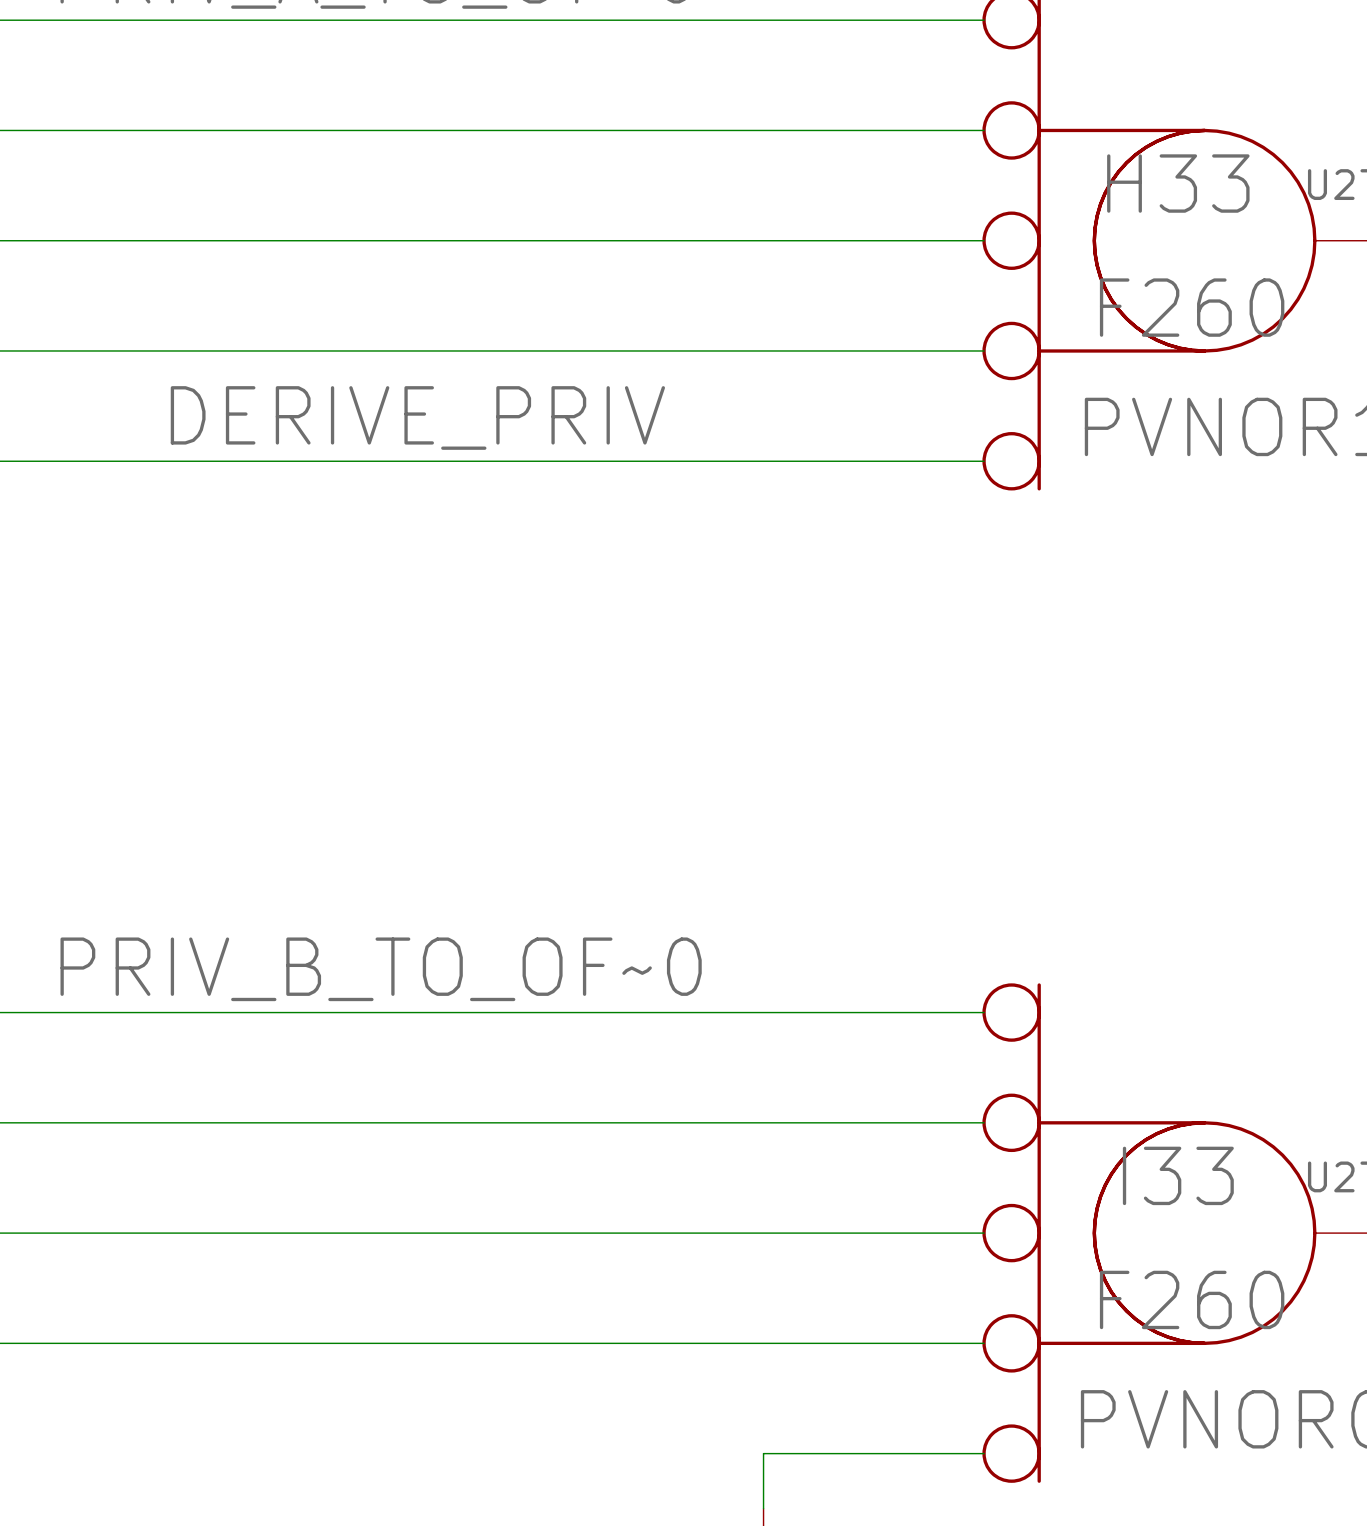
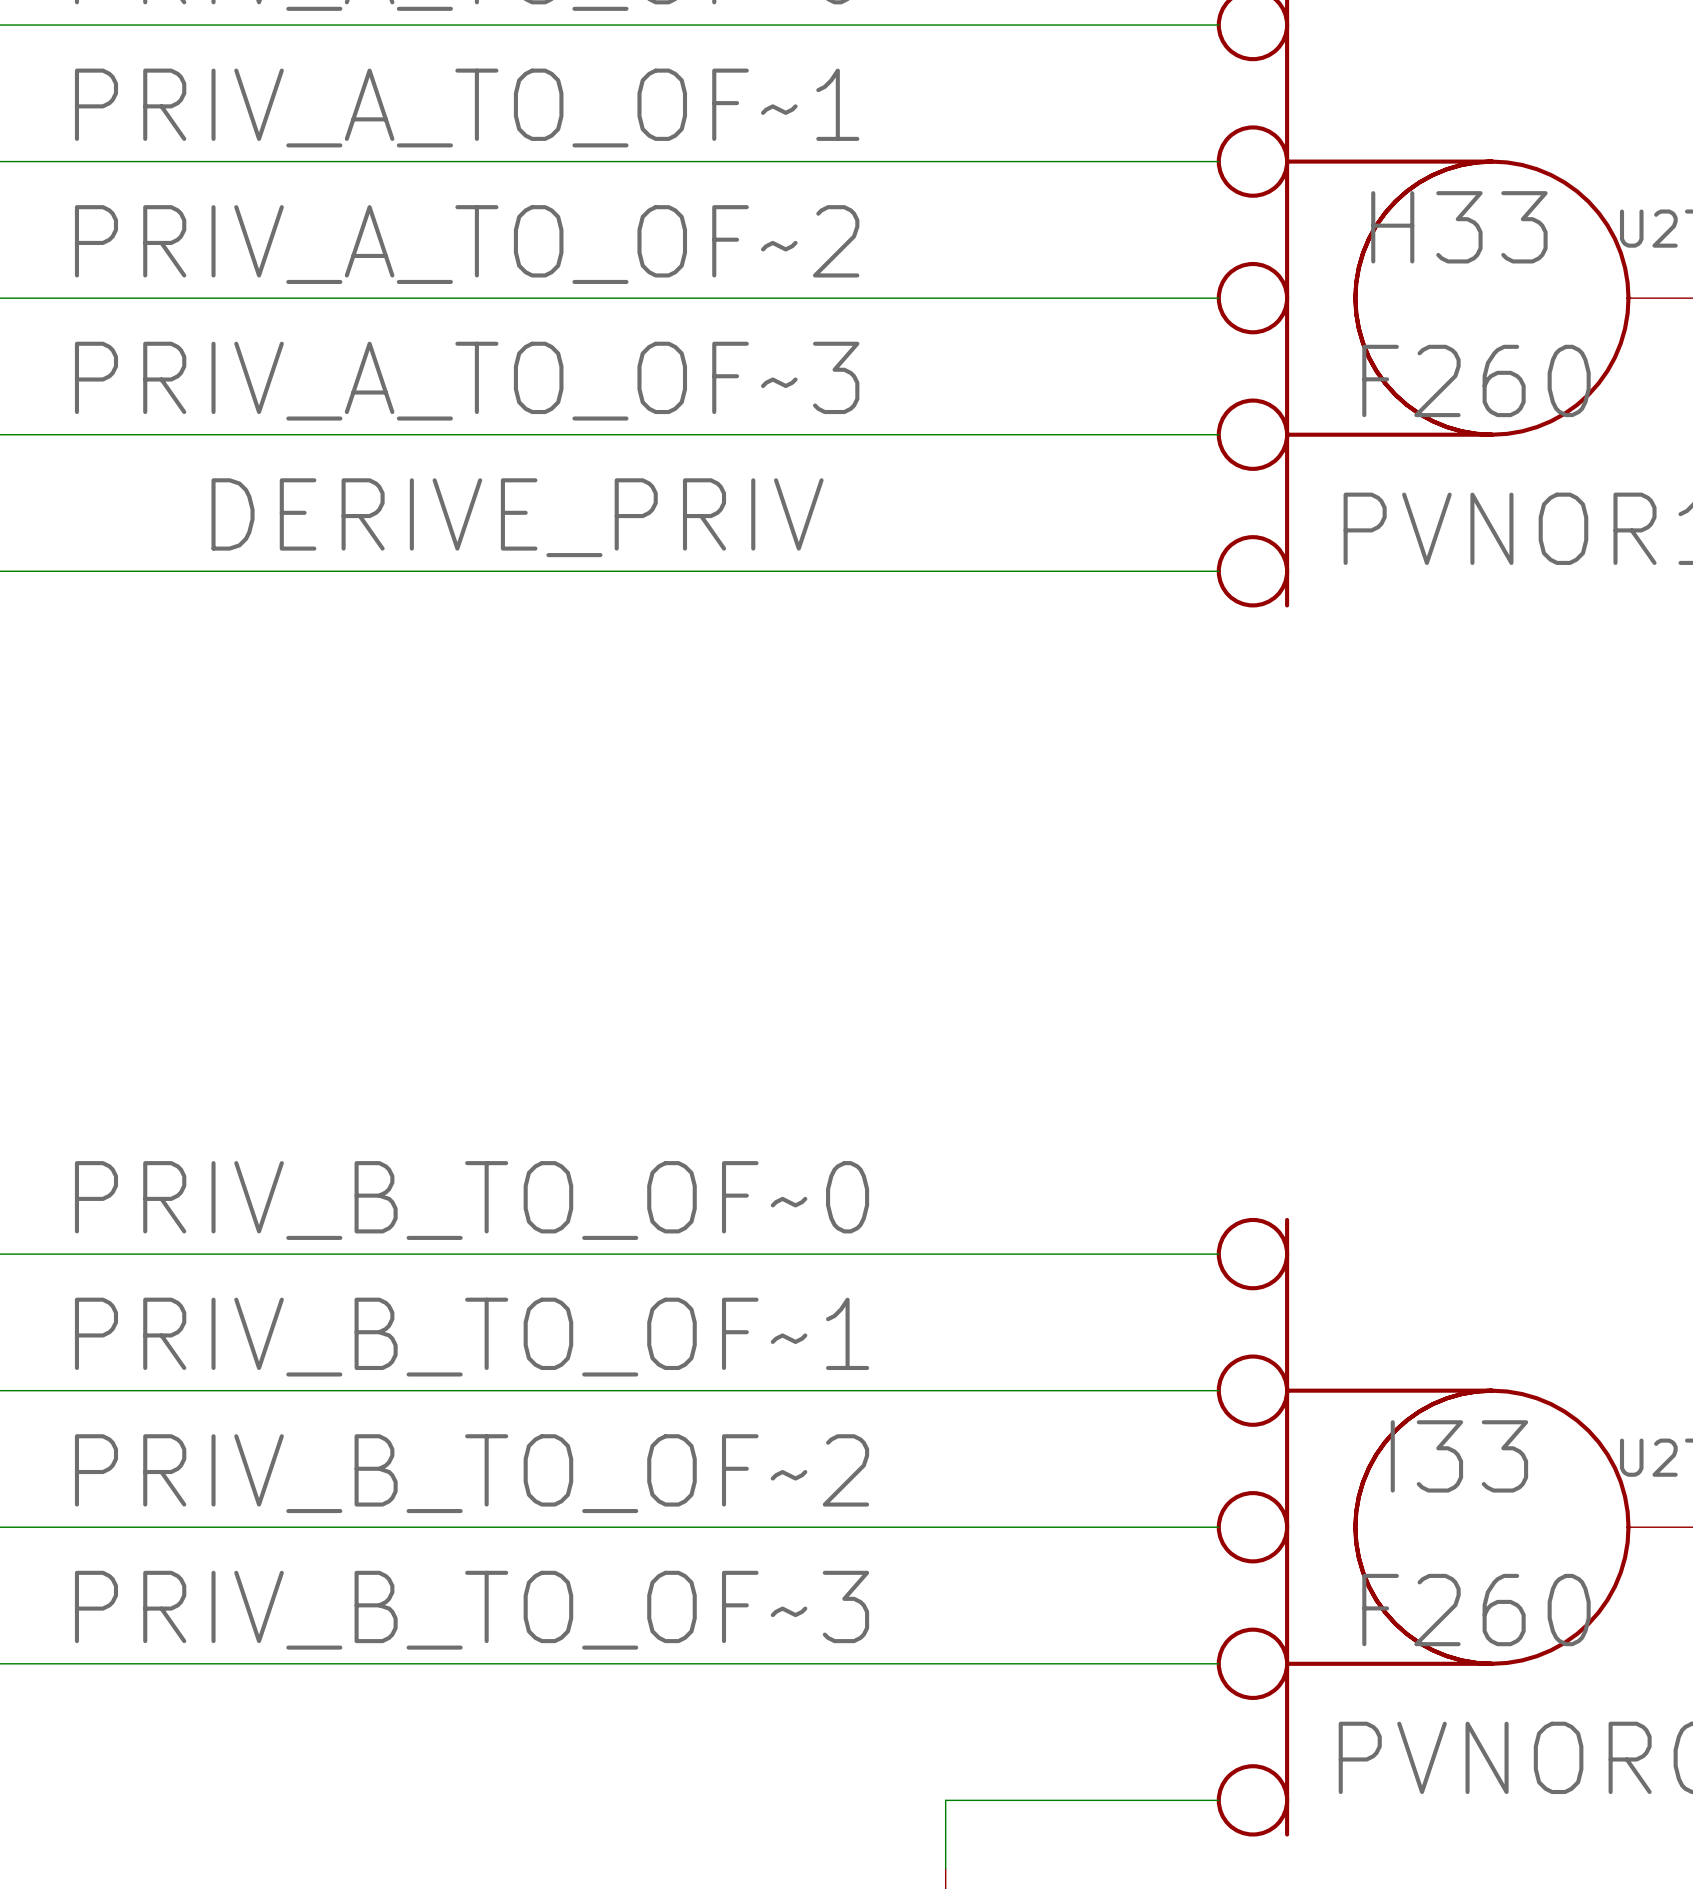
label: none -> PRIV_A_TO_OF~1 (467, 108)
label: none -> PRIV_A_TO_OF~2 (467, 244)
label: none -> PRIV_A_TO_OF~3 (467, 381)
label: none -> PRIV_B_TO_OF~1 (472, 1337)
label: none -> PRIV_B_TO_OF~2 (472, 1473)
label: none -> PRIV_B_TO_OF~3 (472, 1610)

